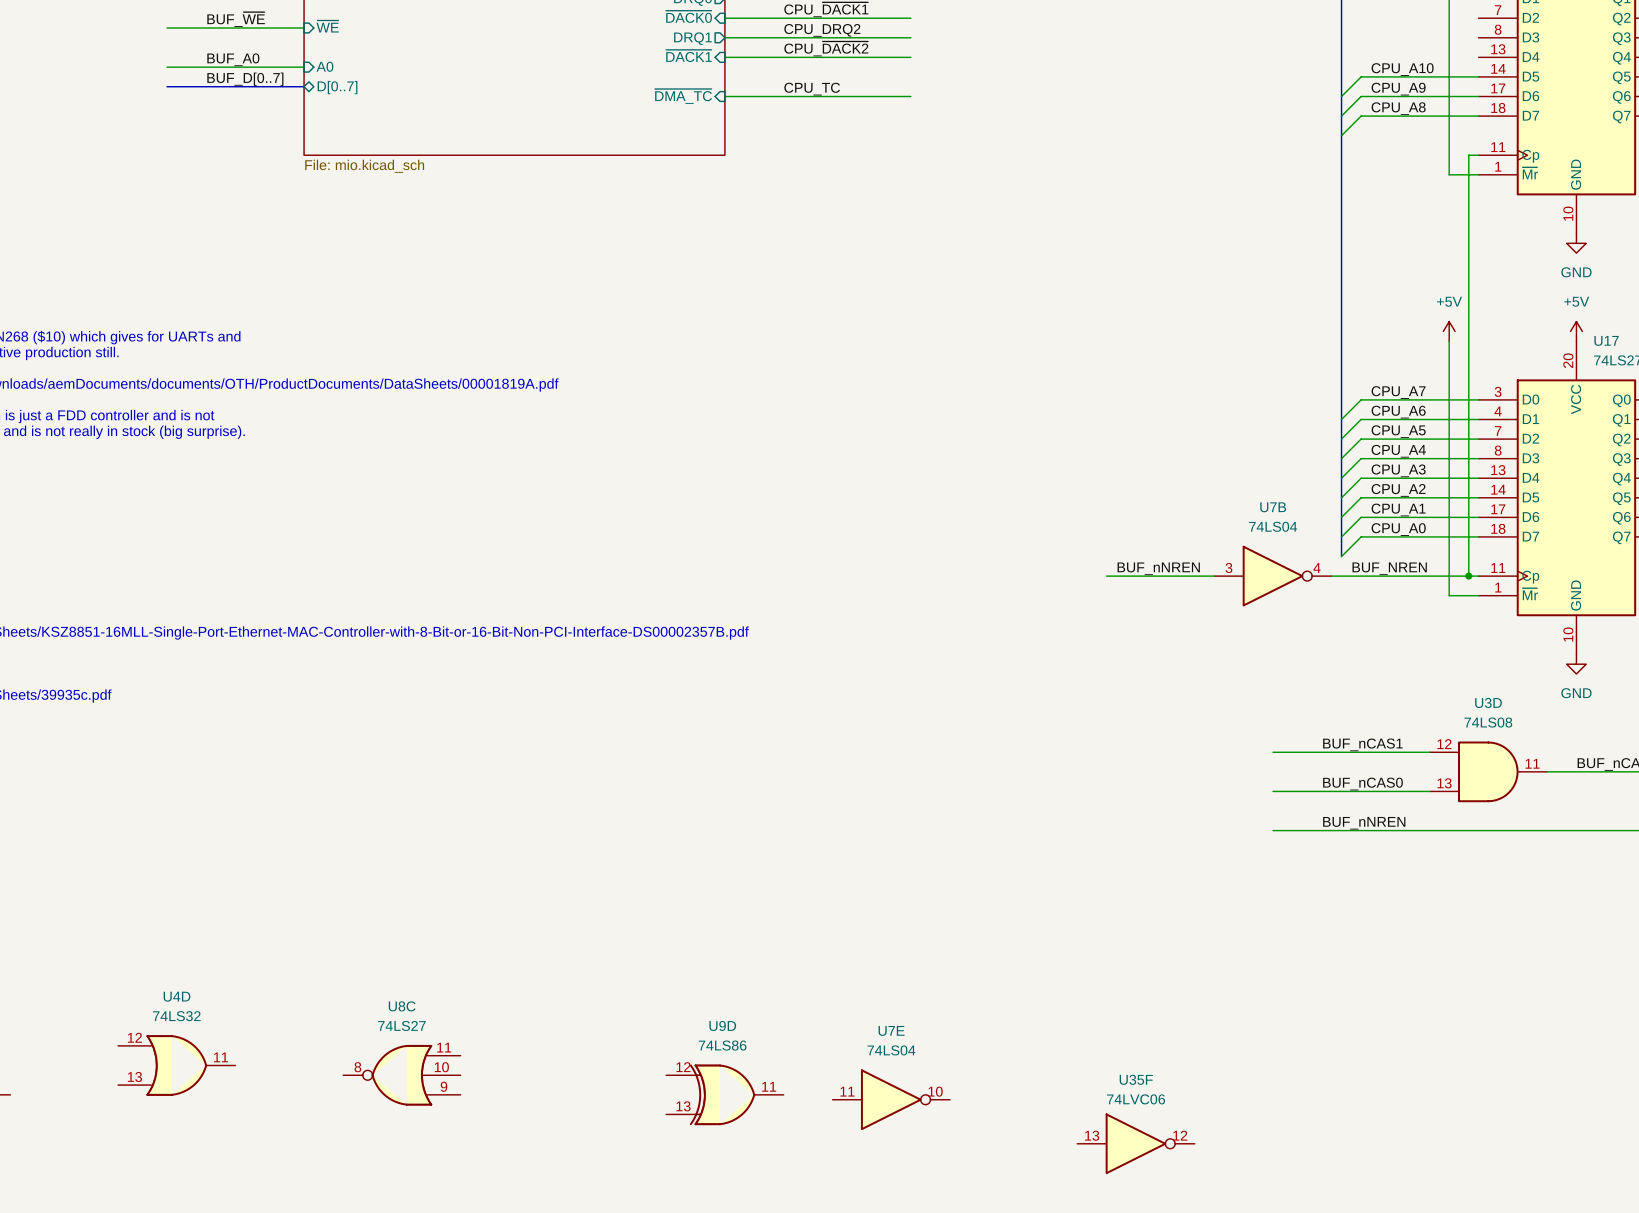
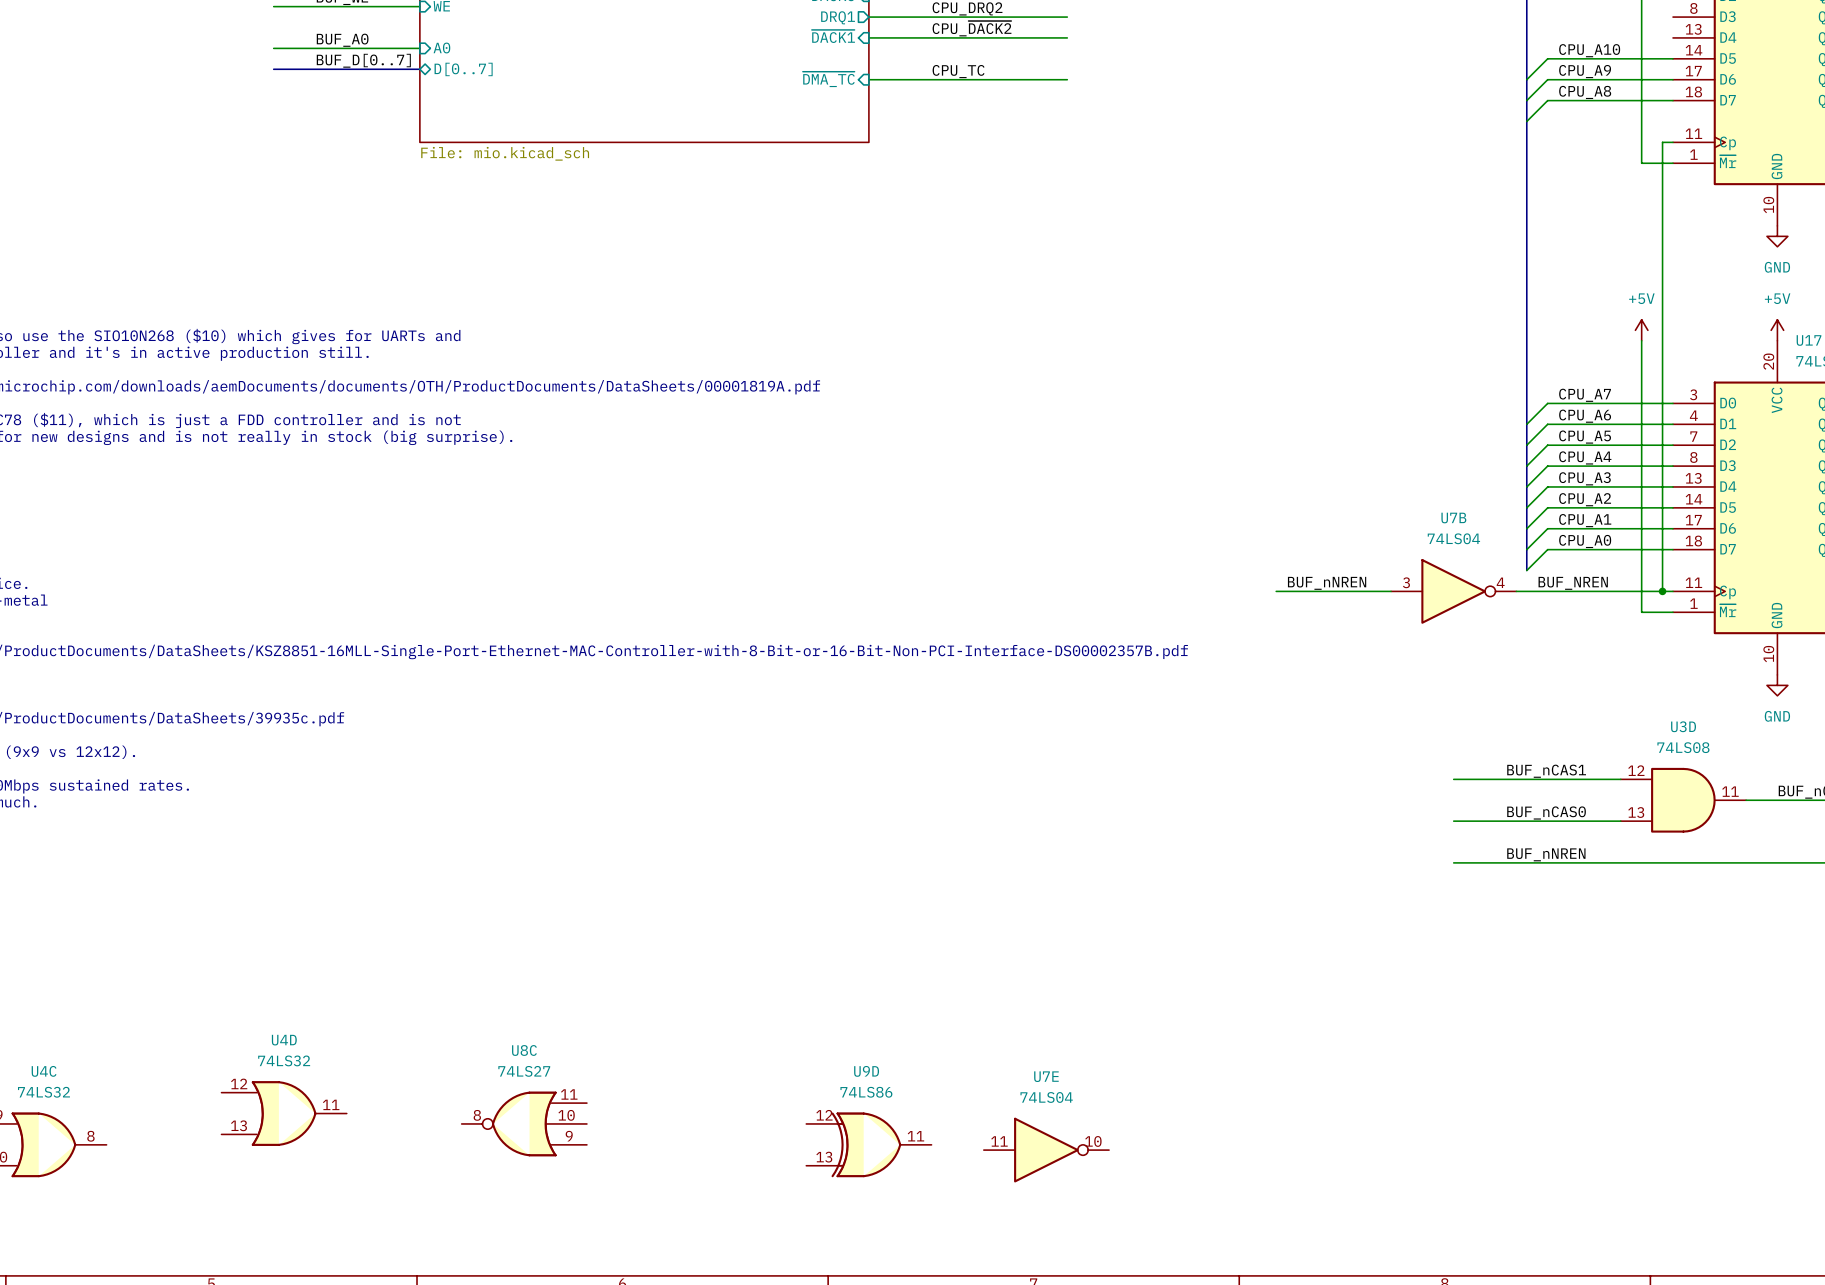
U35F: 74LVC06 (1136, 1143) -> none

